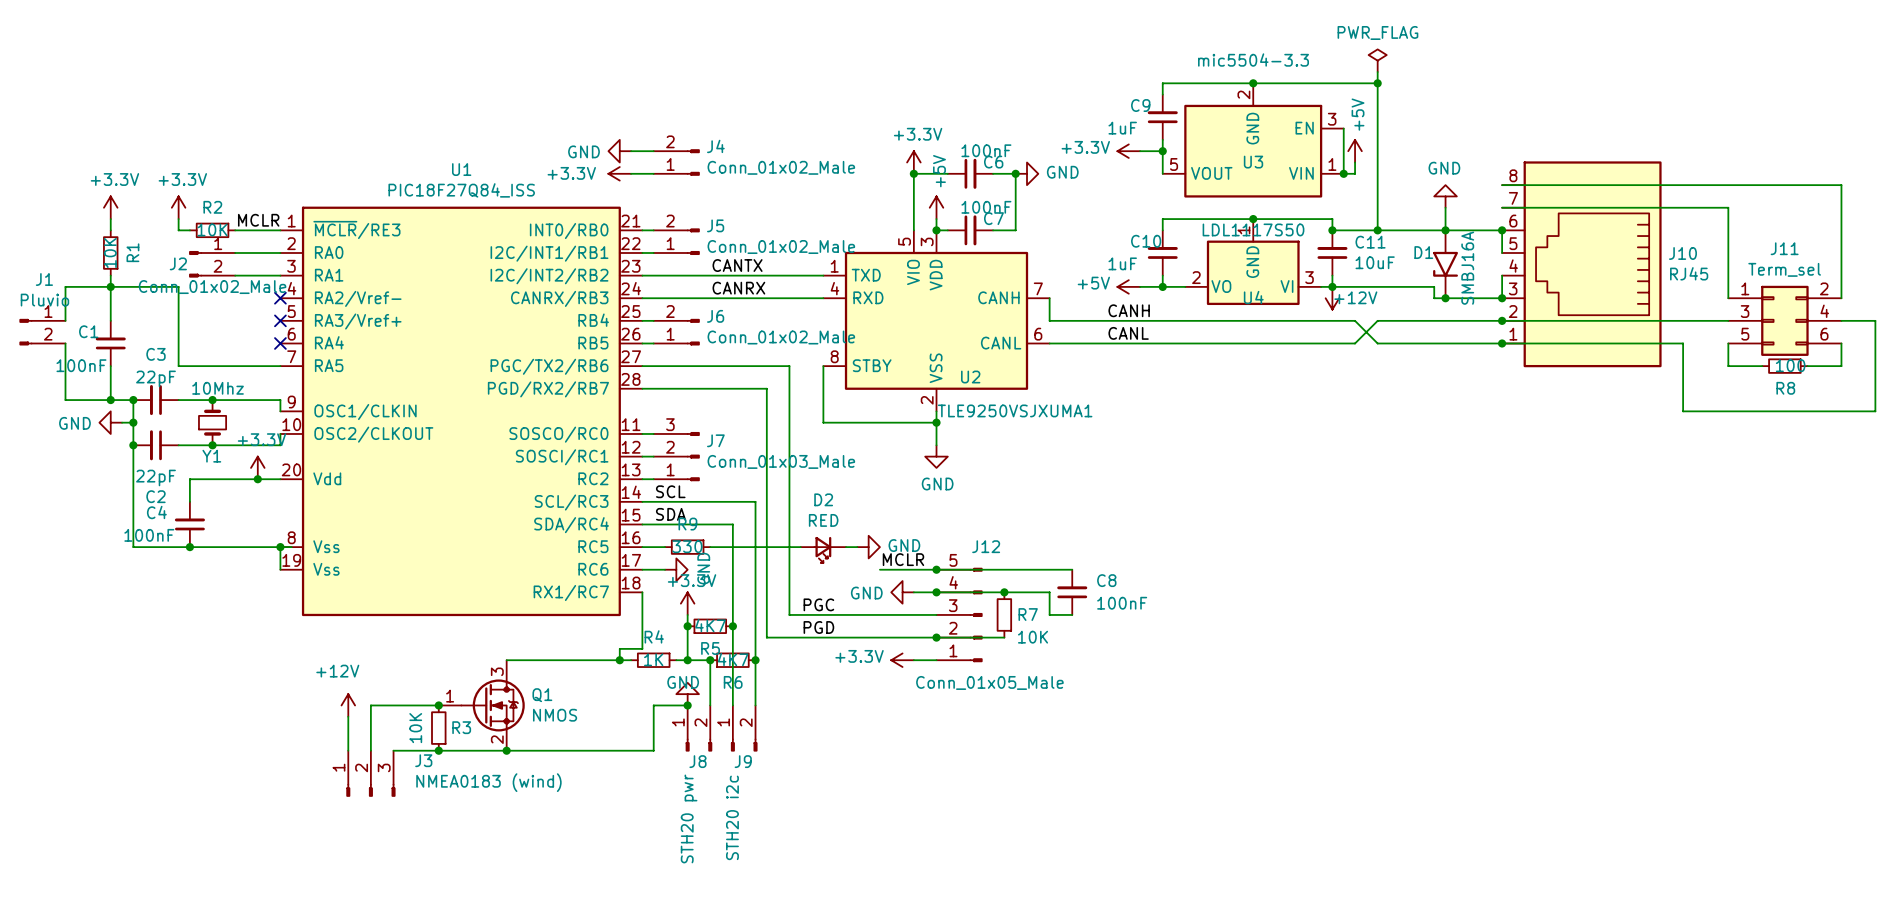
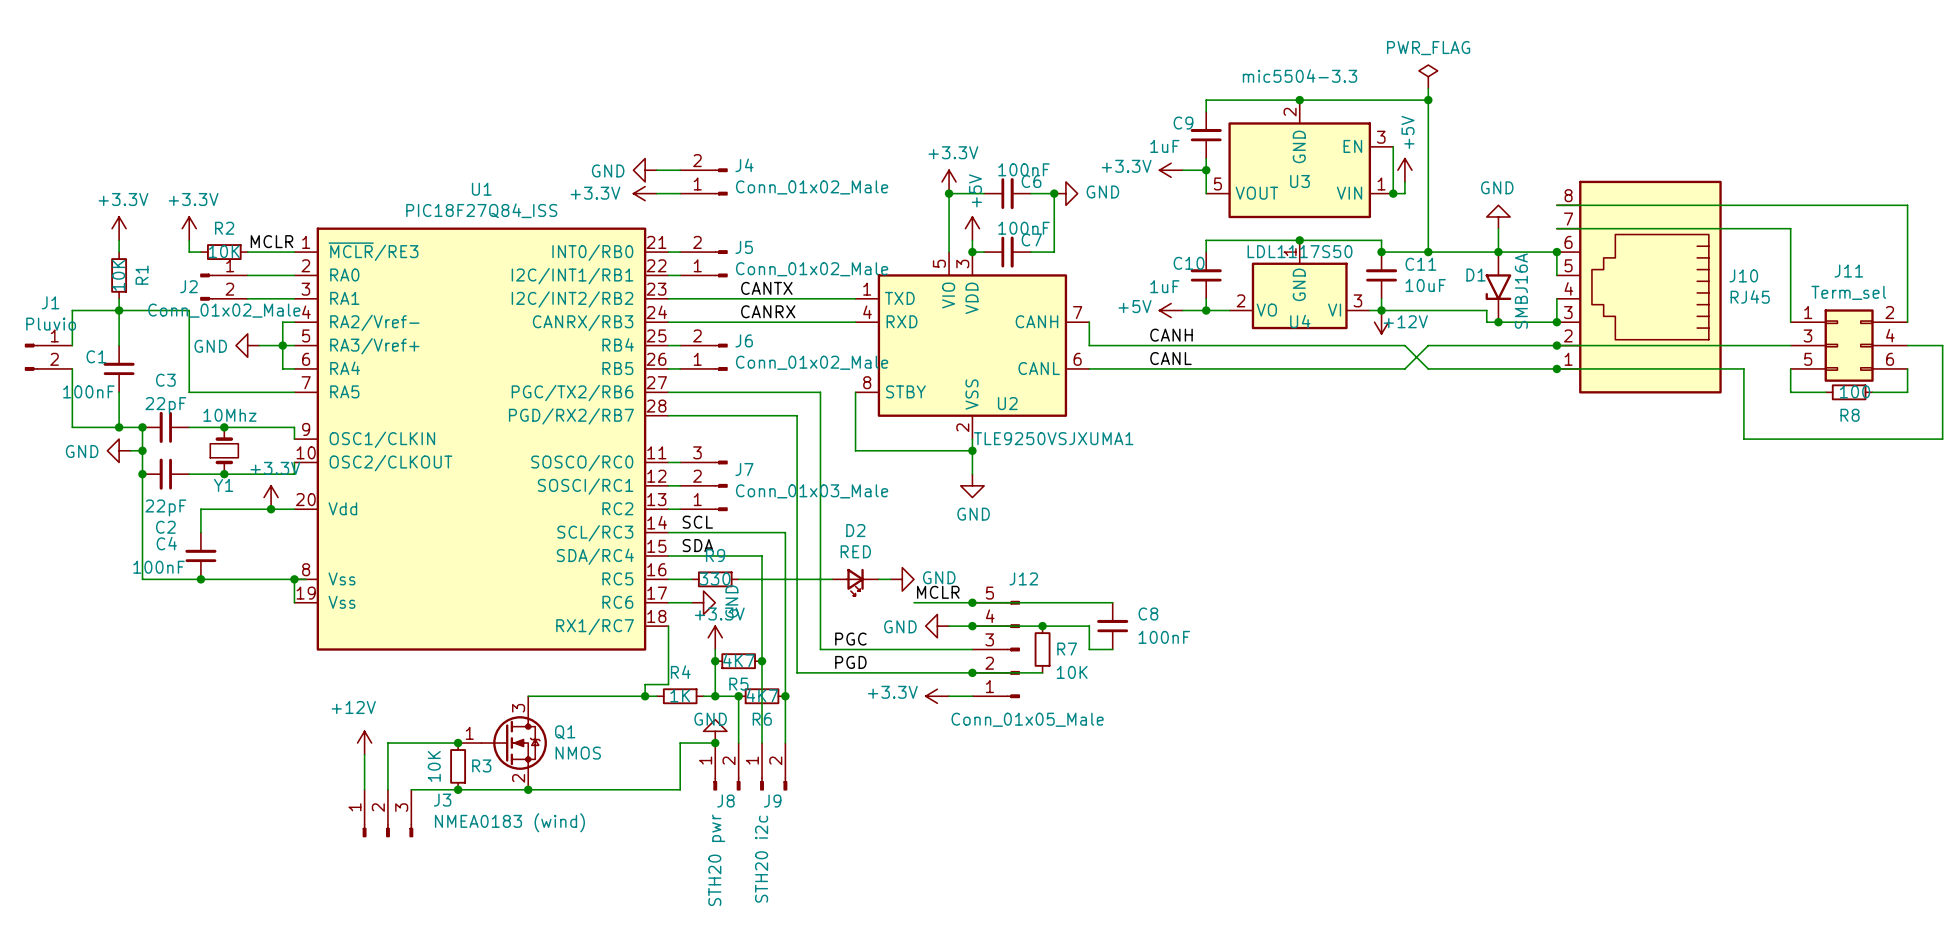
wire: none -> (294, 322) (282, 322) (282, 368) (294, 368)
no-connect mark: (280, 298) -> none
power symbol: none -> GND (247, 345)
wire: none -> (259, 345) (294, 345)
junction: none -> (282, 345)
no-connect mark: (280, 320) -> none
no-connect mark: (280, 343) -> none

